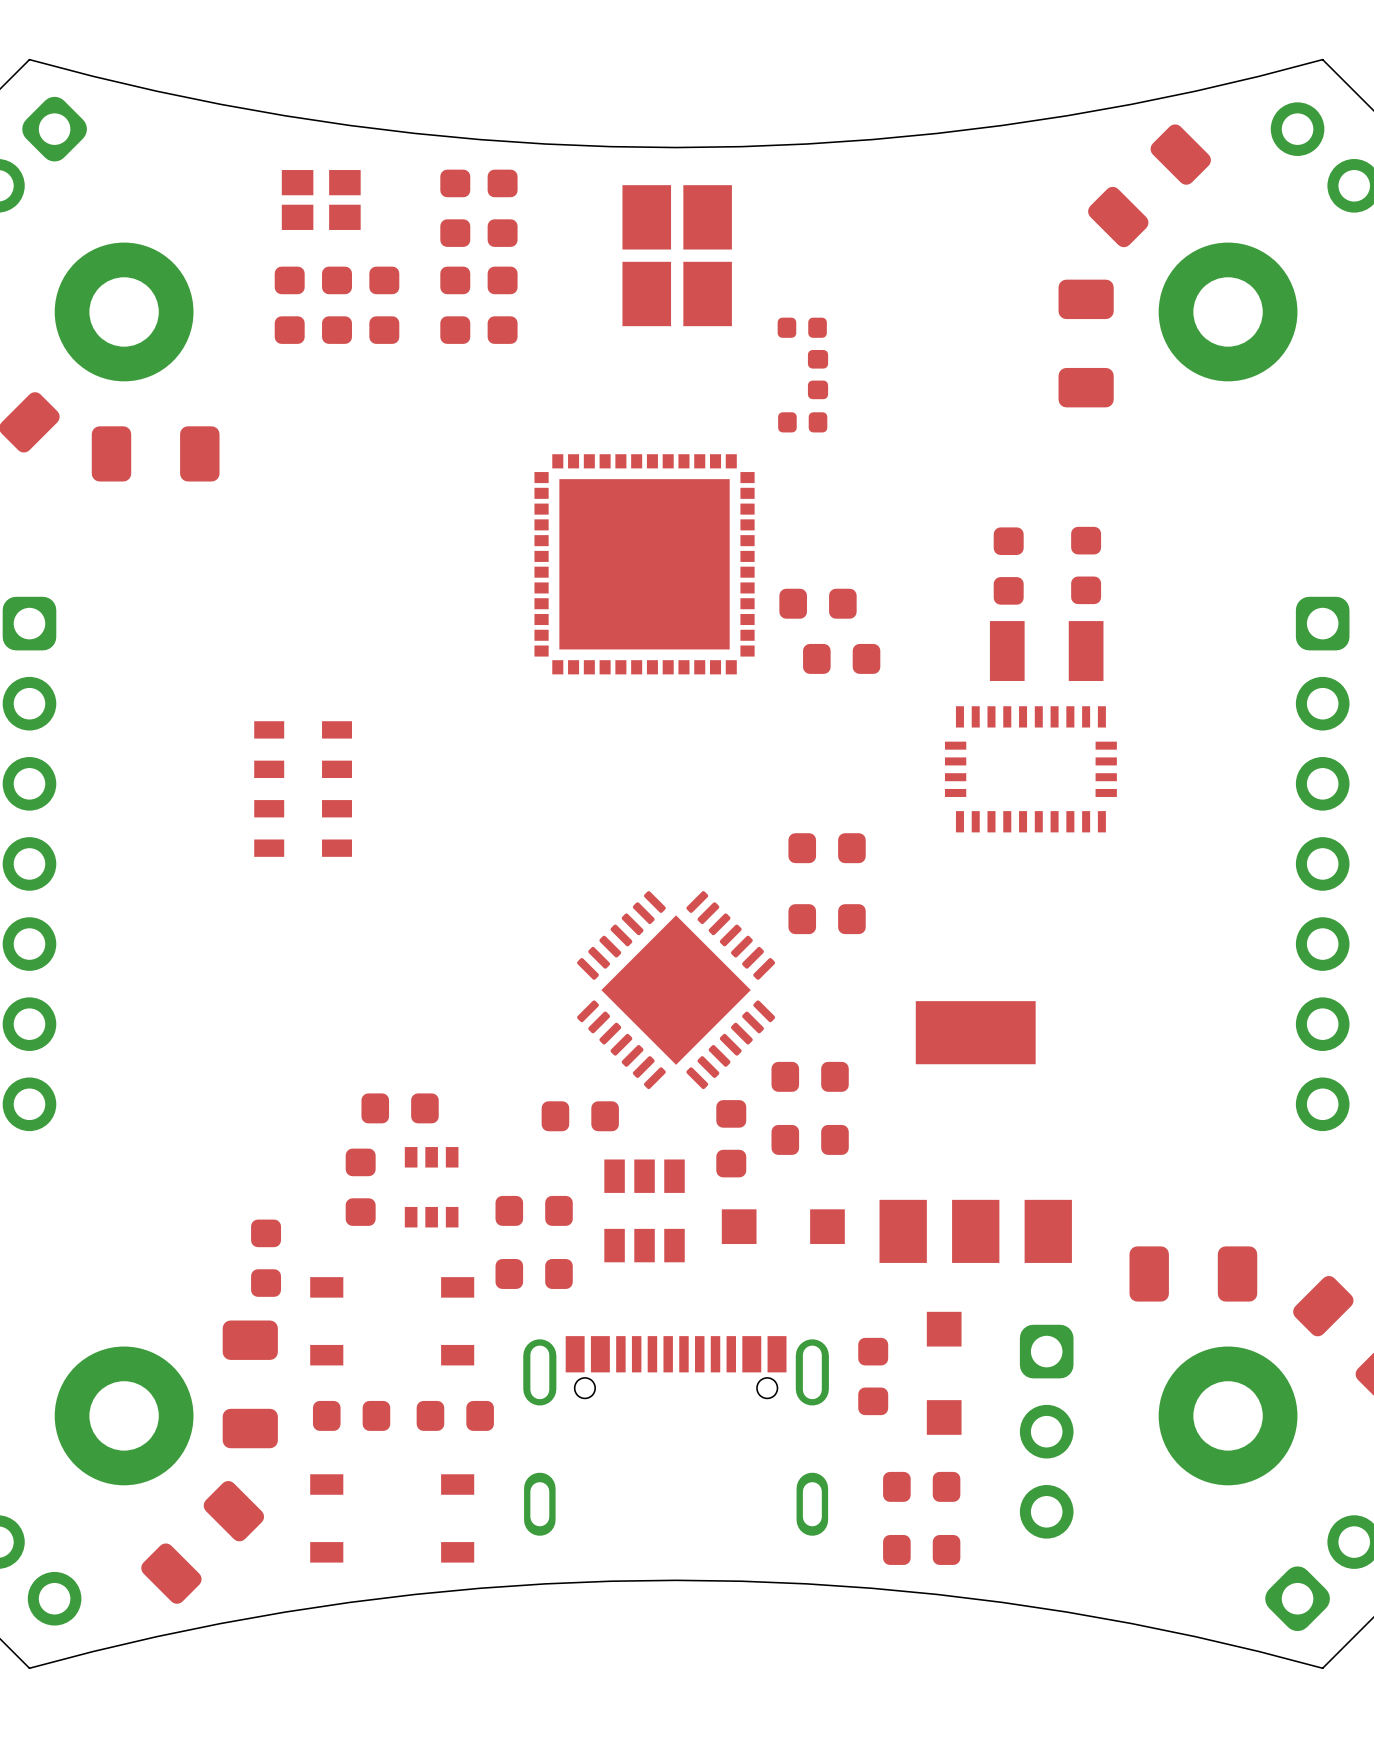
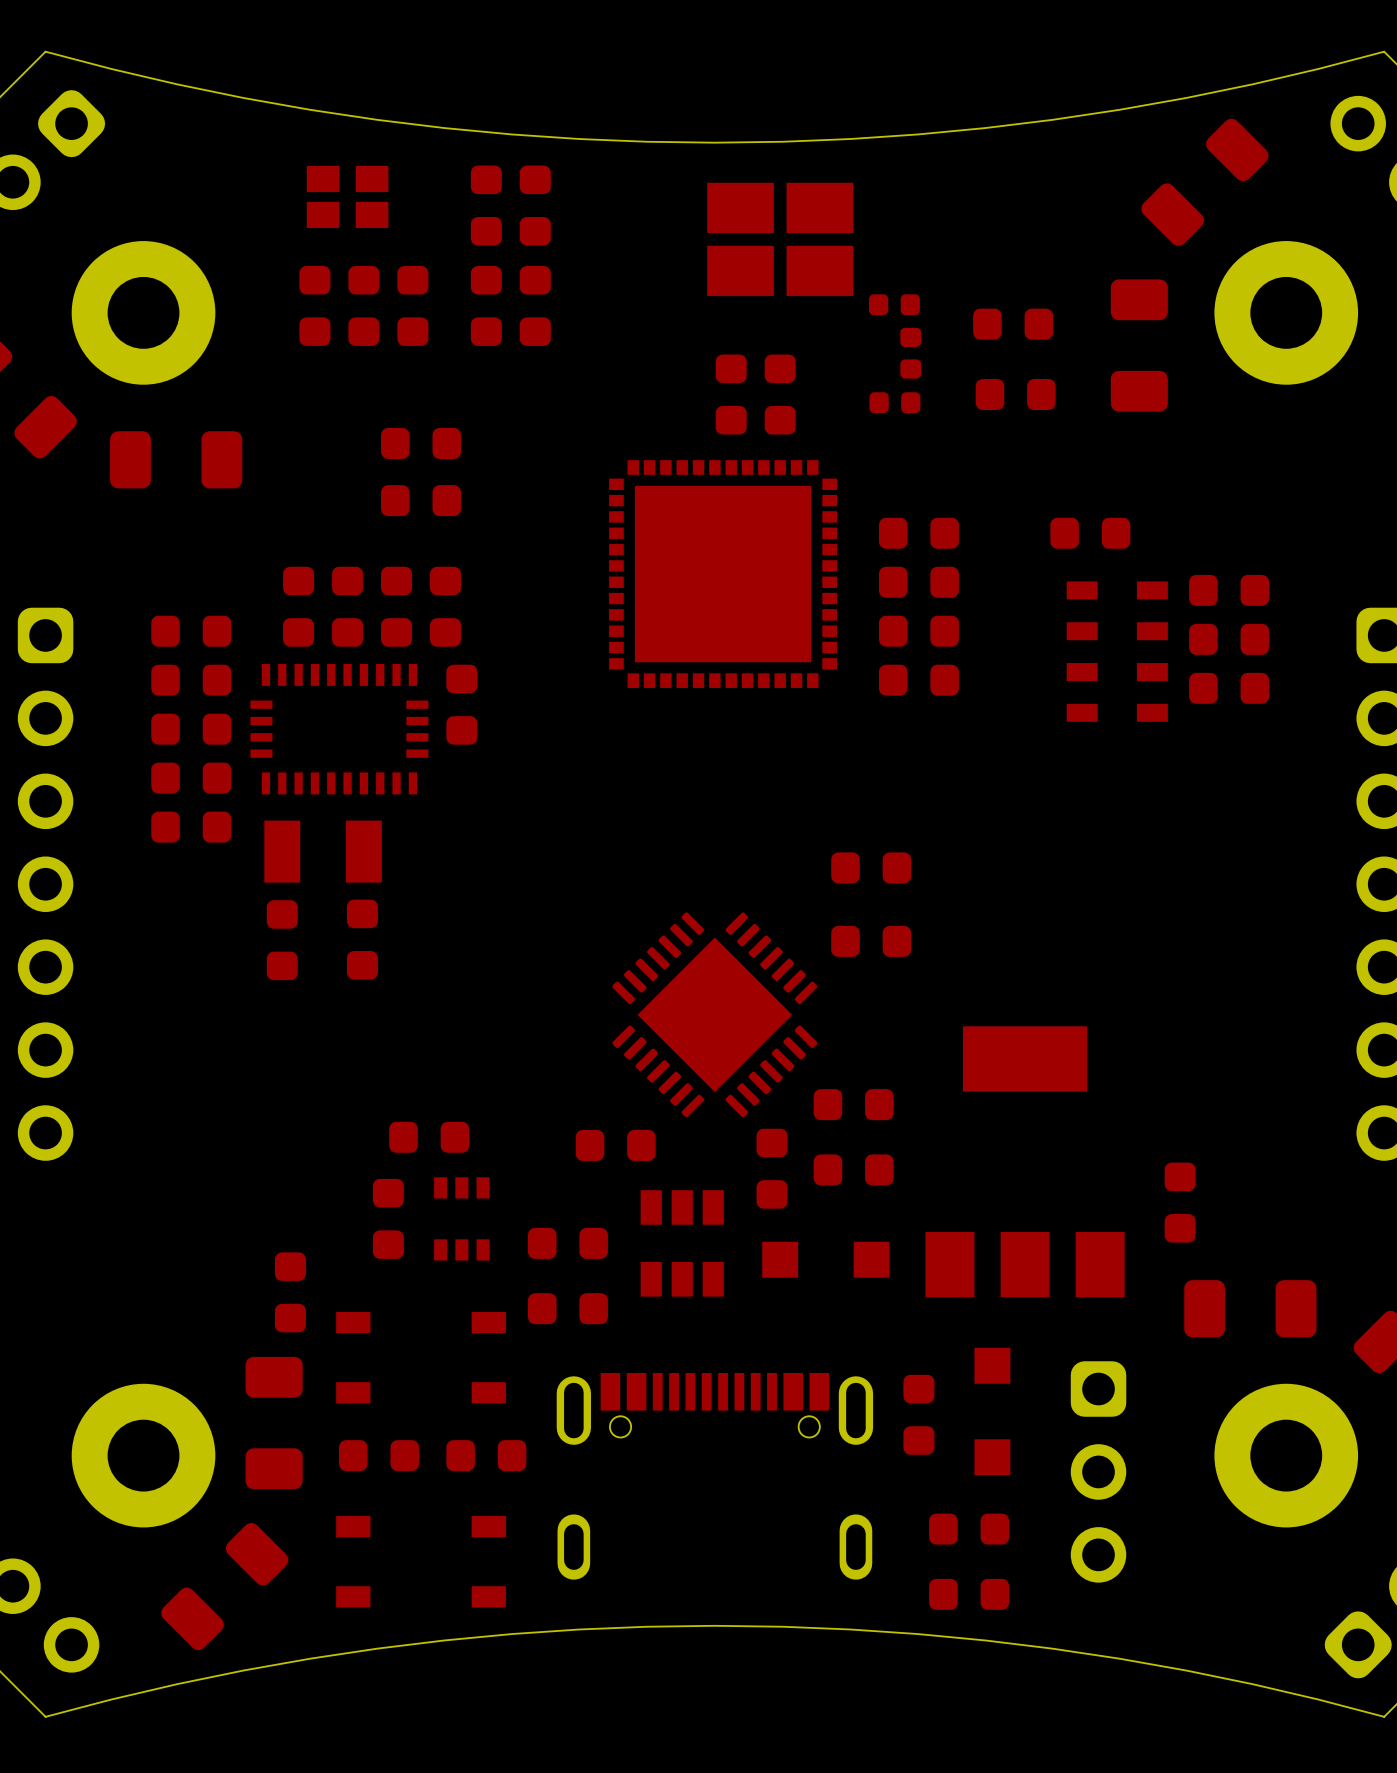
part rotation: 0° (677, 255) -> 90° clockwise (780, 239)
part: none -> (894, 304)
part: none -> (1013, 324)
part: (802, 327) -> none
part: none -> (910, 353)
part: (818, 374) -> none
part: none -> (731, 394)
part: none -> (780, 394)
part: none -> (1015, 394)
part: none -> (894, 402)
part: (802, 422) -> none
part: none -> (421, 443)
part: none -> (421, 500)
part: none -> (918, 533)
part: none -> (1090, 533)
part position: (644, 564) -> (723, 574)
part: (1086, 565) -> none
part: (1008, 566) -> none
part: none -> (918, 582)
part: none -> (1229, 590)
part: none -> (298, 606)
part: none -> (347, 606)
part: none -> (396, 606)
part: none -> (445, 606)
part: (818, 603) -> none
part: none -> (191, 631)
part: none -> (918, 631)
part footprint: [989, 621, 1104, 682] -> [1066, 581, 1168, 722]
part: none -> (1229, 639)
part: (841, 658) -> none
part: none -> (191, 680)
part: none -> (918, 680)
part: none -> (1229, 688)
part: none -> (461, 704)
part: none -> (191, 729)
part: none -> (191, 778)
part position: (1030, 769) -> (339, 729)
part: (303, 789) -> none
part: none -> (191, 827)
part: none -> (323, 851)
part: none -> (282, 940)
part: none -> (362, 939)
part: none -> (1180, 1202)

